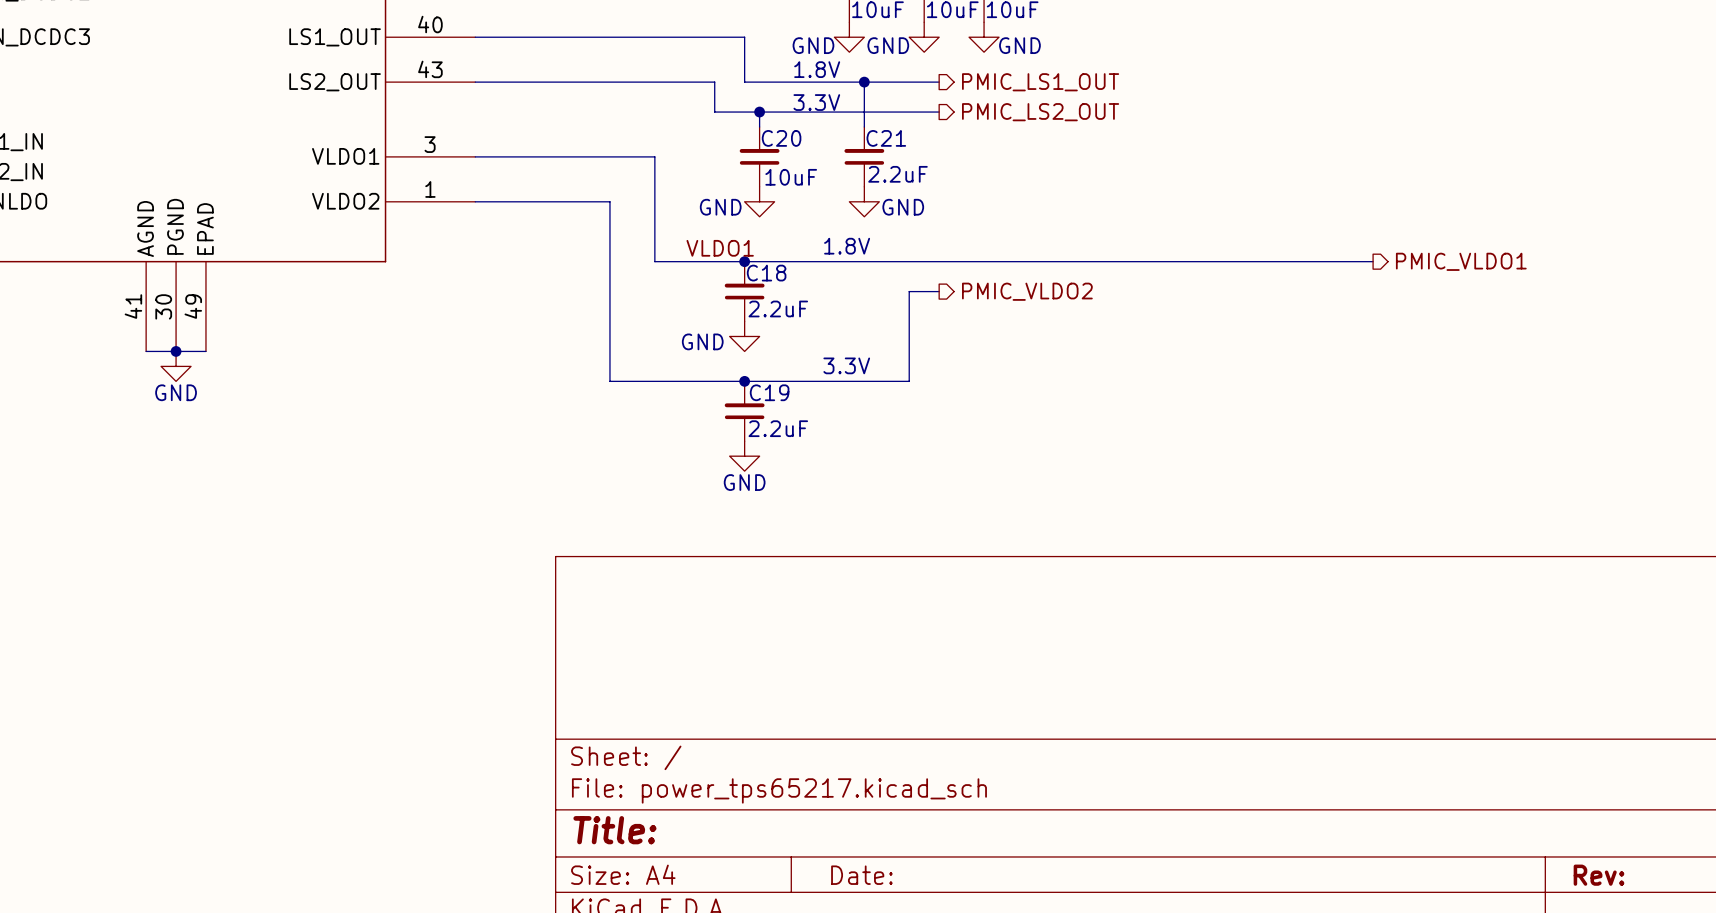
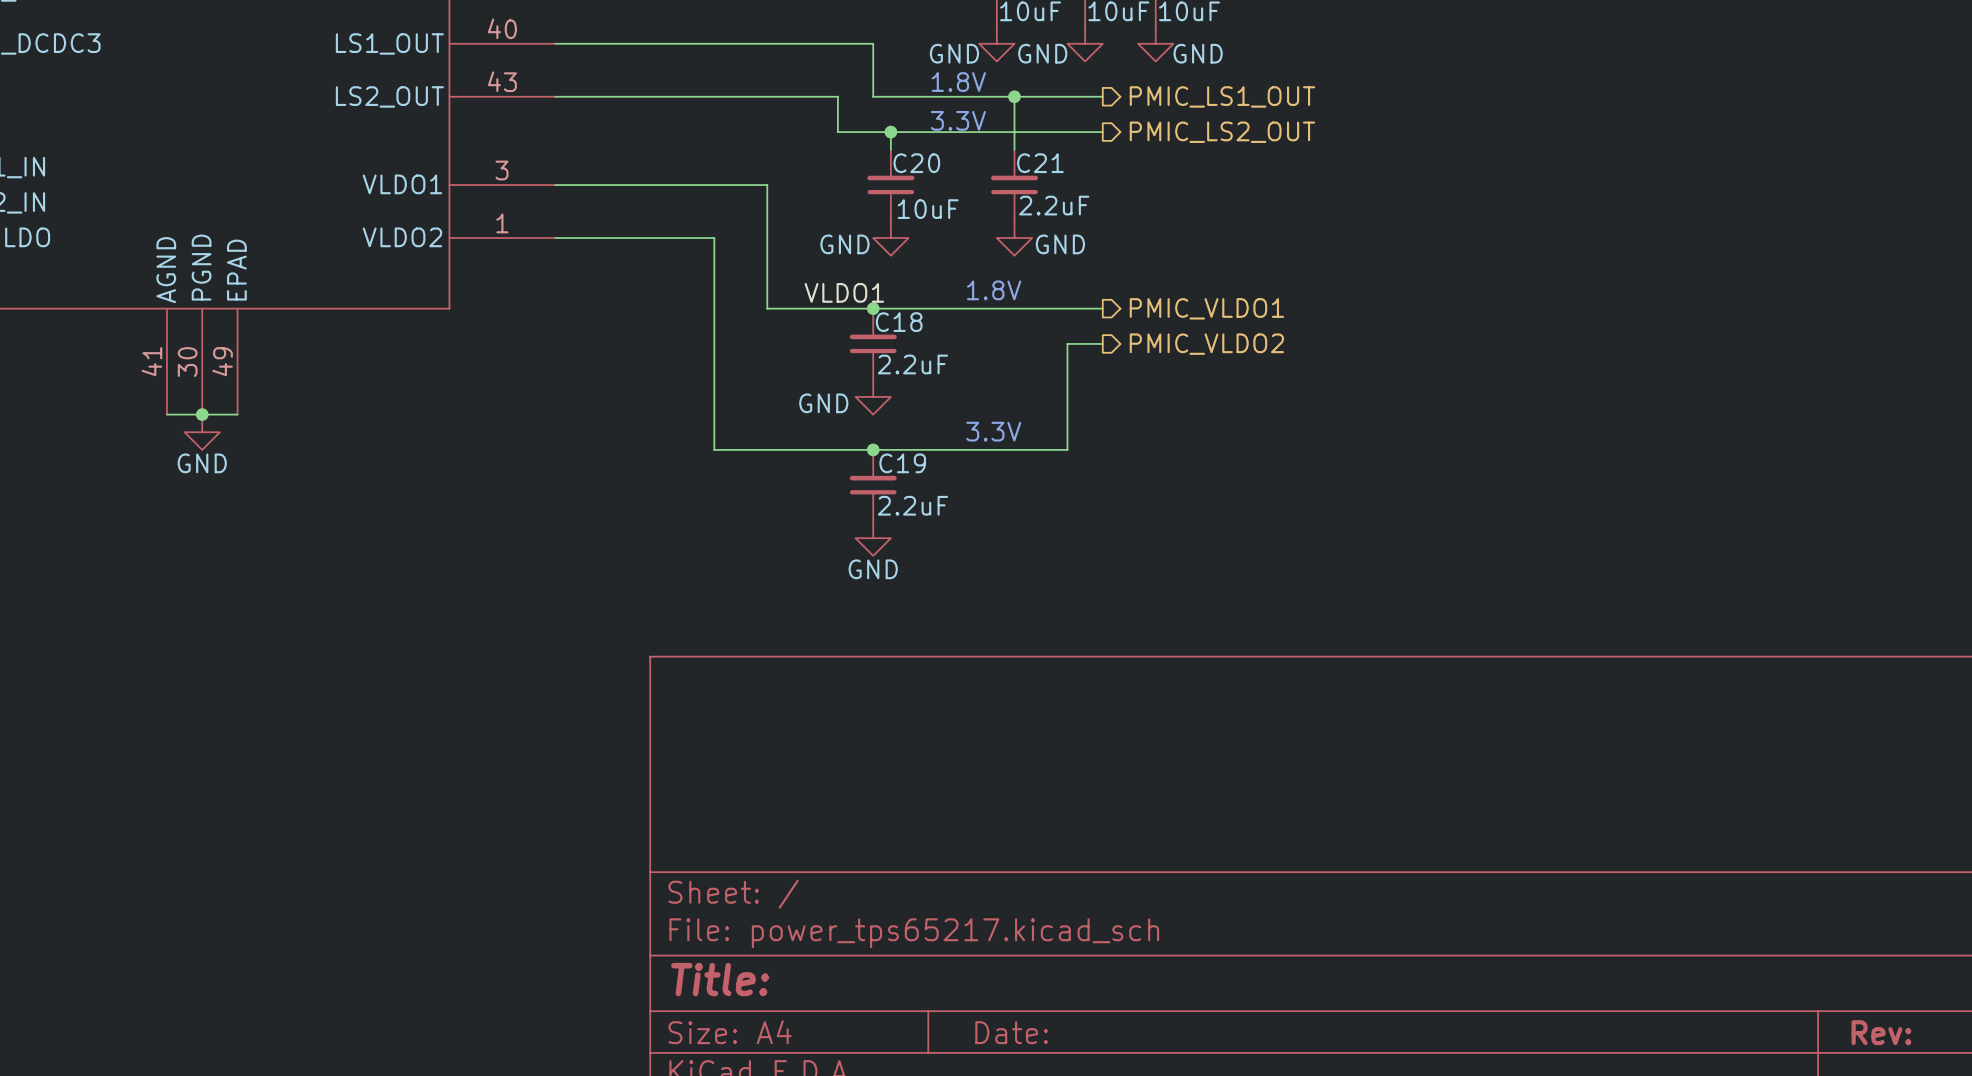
wire: (939, 261) (1373, 261) -> none
hierarchical label: none -> PMIC_VLDO1 (1206, 308)
hierarchical label: PMIC_VLDO1 (1461, 261) -> none

